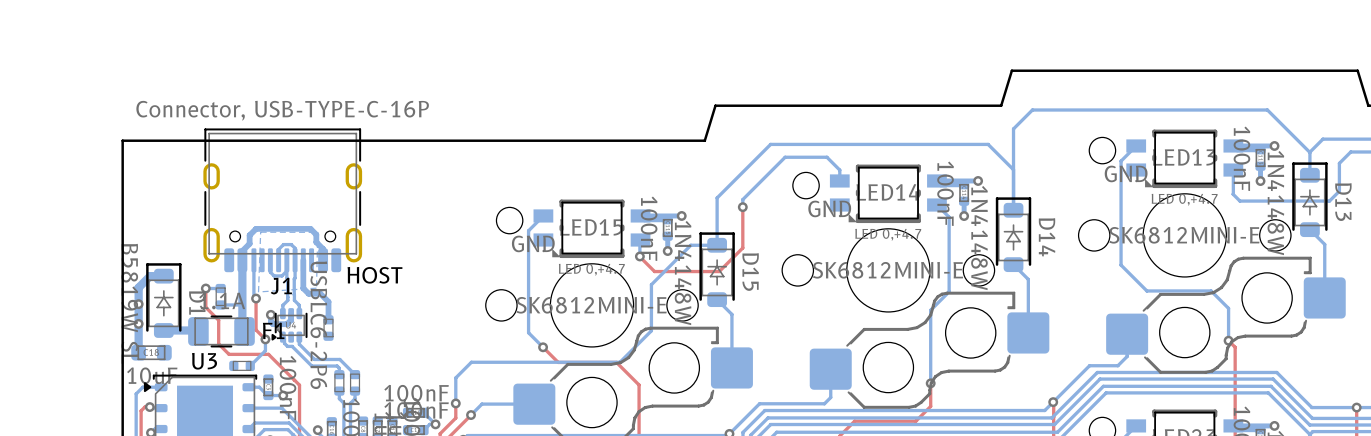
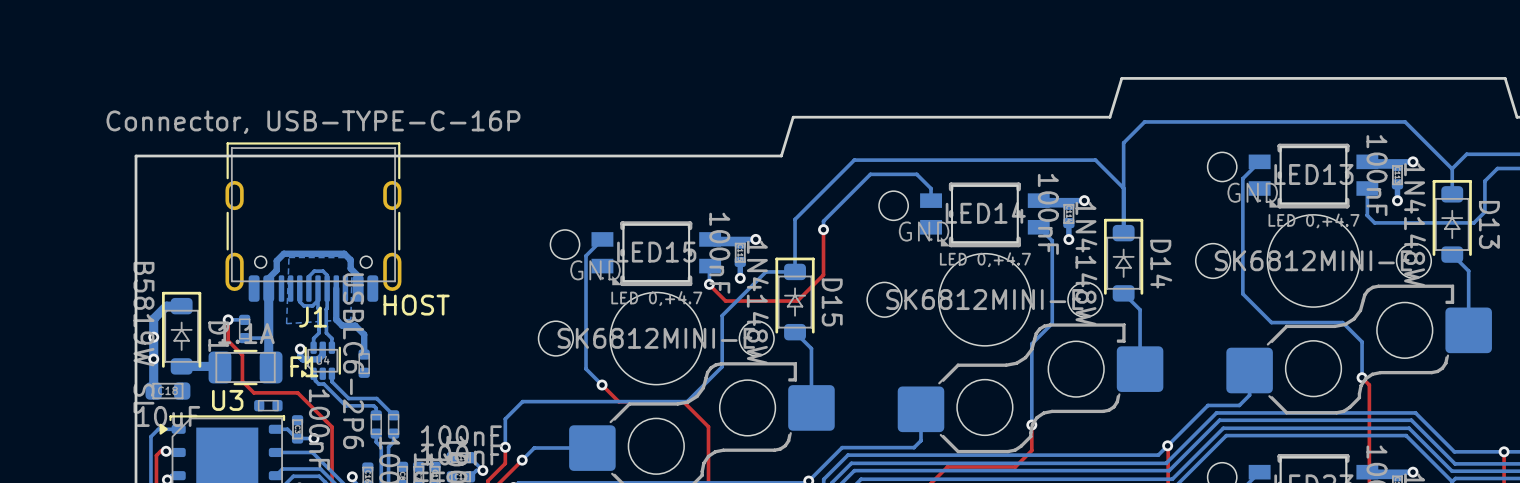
bottom track: (253, 260) (253, 296) (256, 298) -> none
top track: (256, 298) (256, 330) (265, 339) -> none
via: (256, 298) -> none
bottom track: (265, 339) (265, 350) (250, 365) -> none
via: (265, 339) -> none

